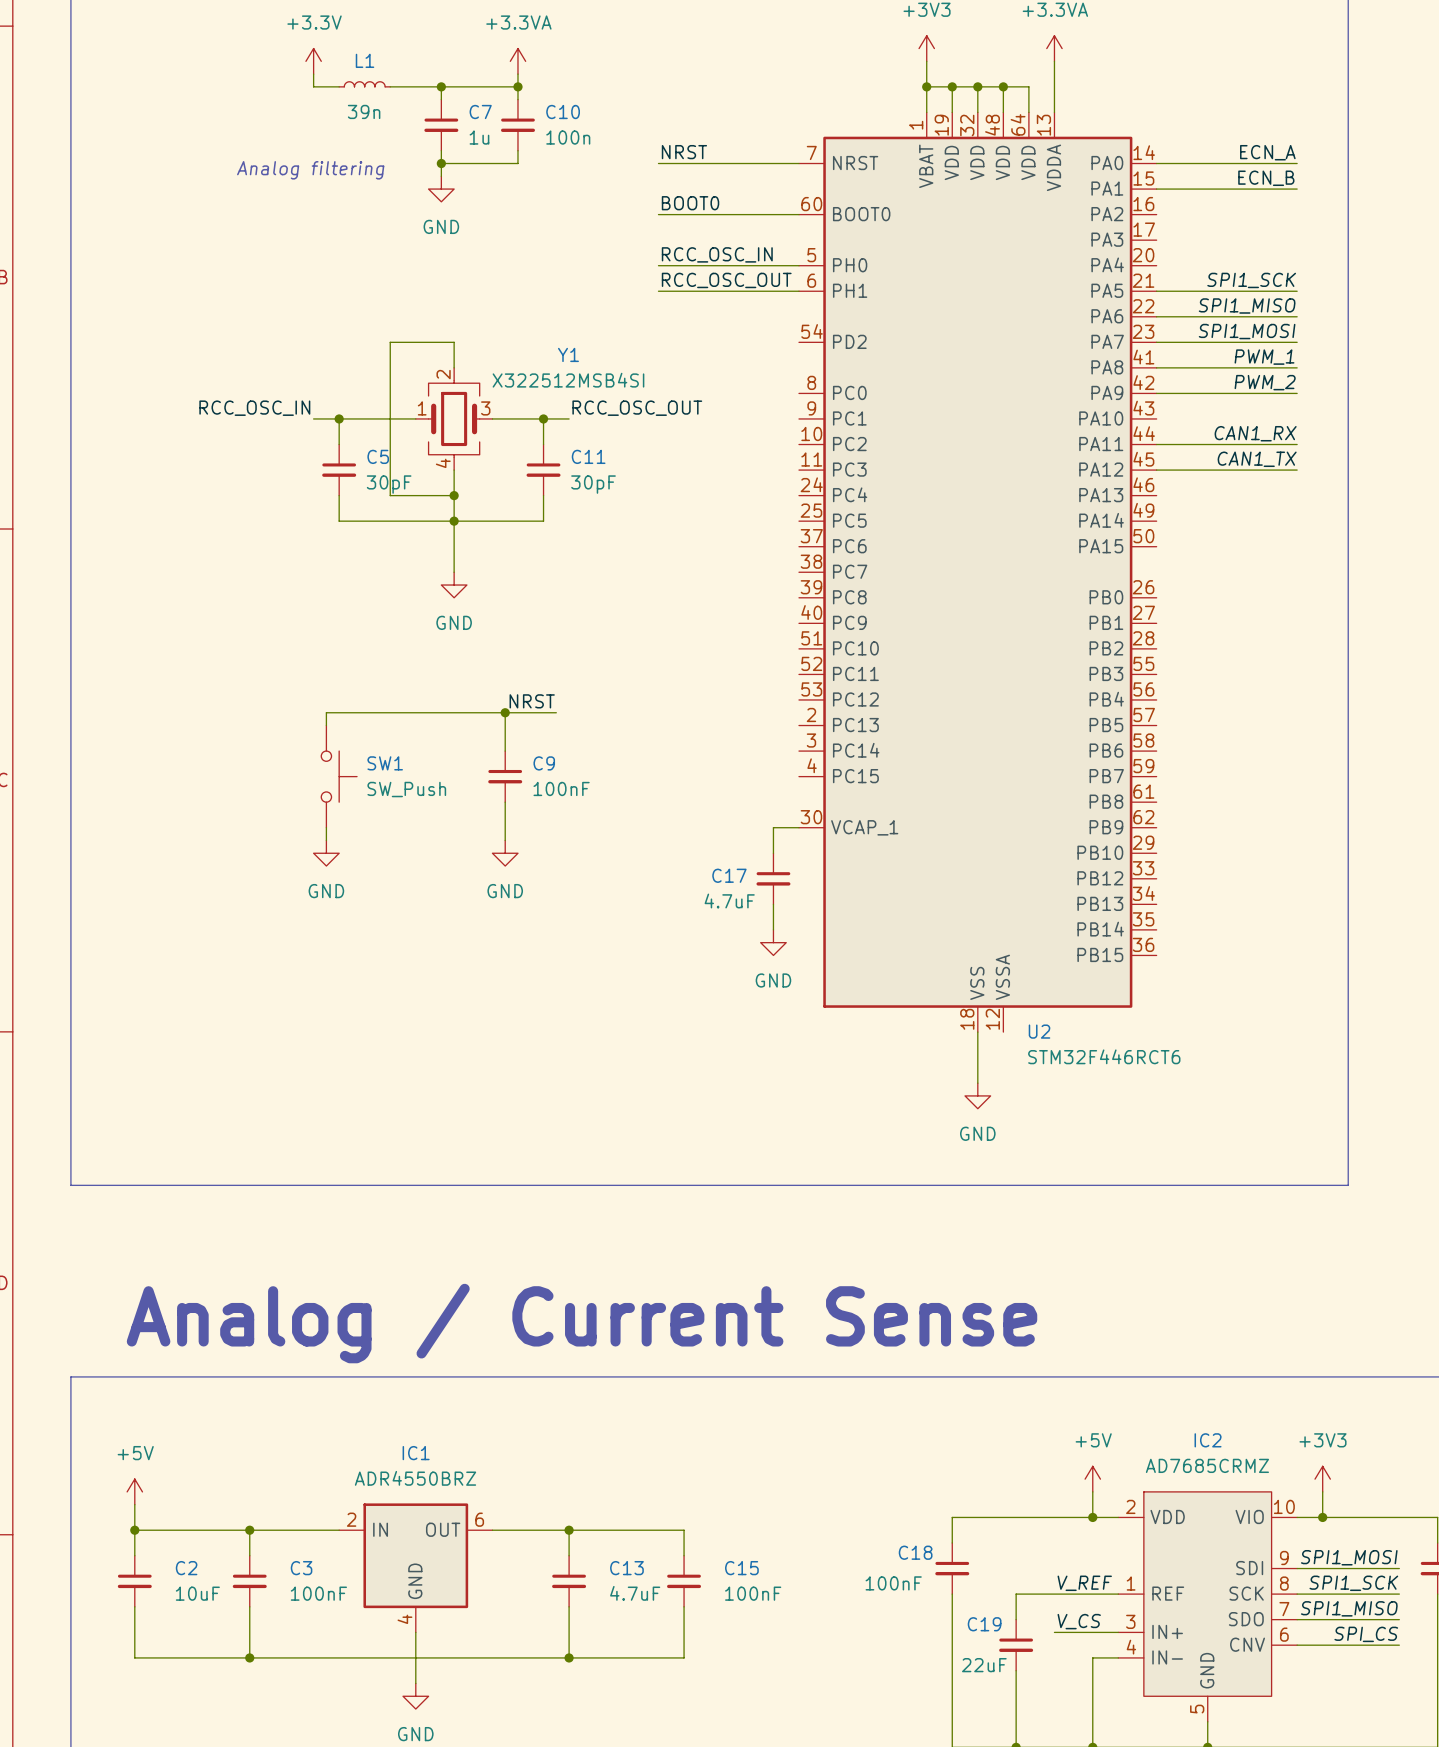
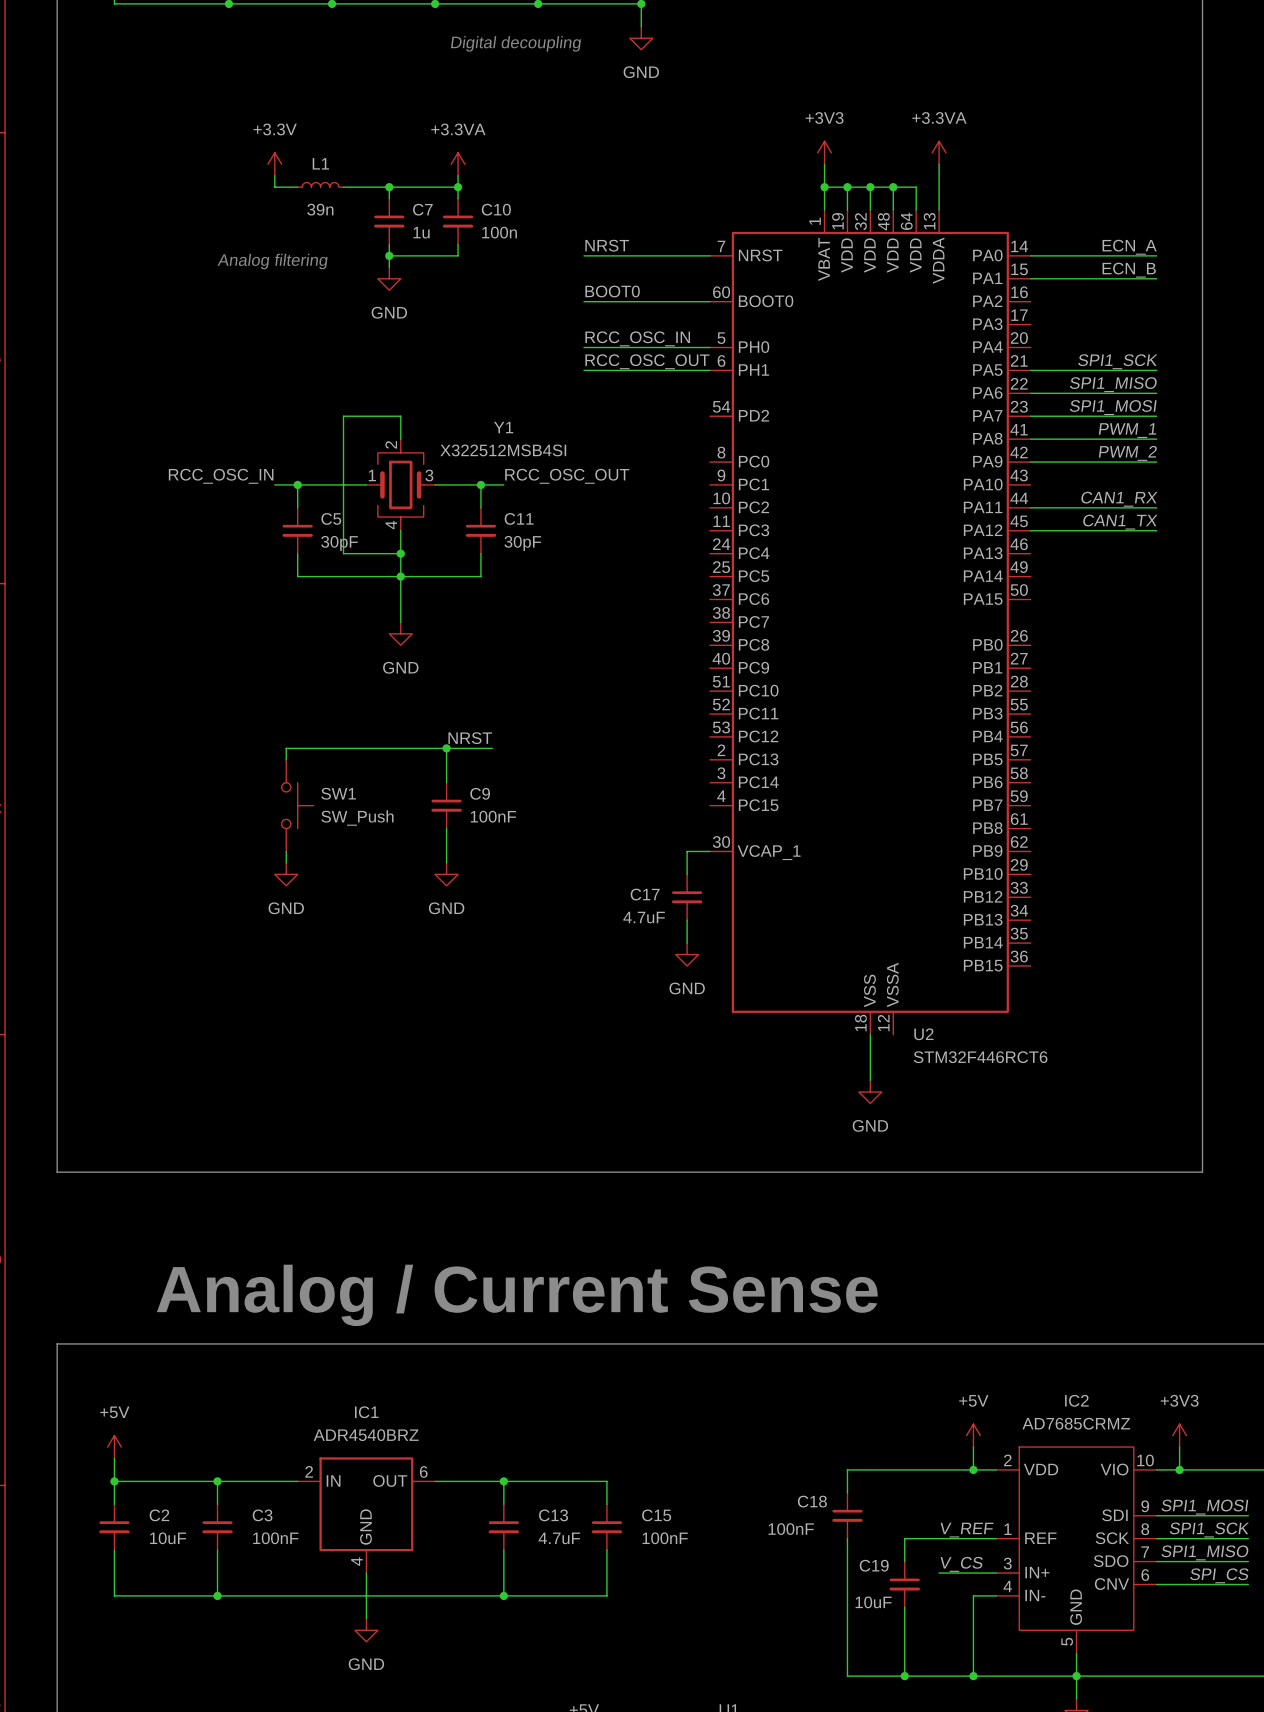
IC1 value: ADR4550BRZ (415, 1478) -> ADR4540BRZ (366, 1435)
C19 value: 22uF (984, 1665) -> 10uF (873, 1602)

